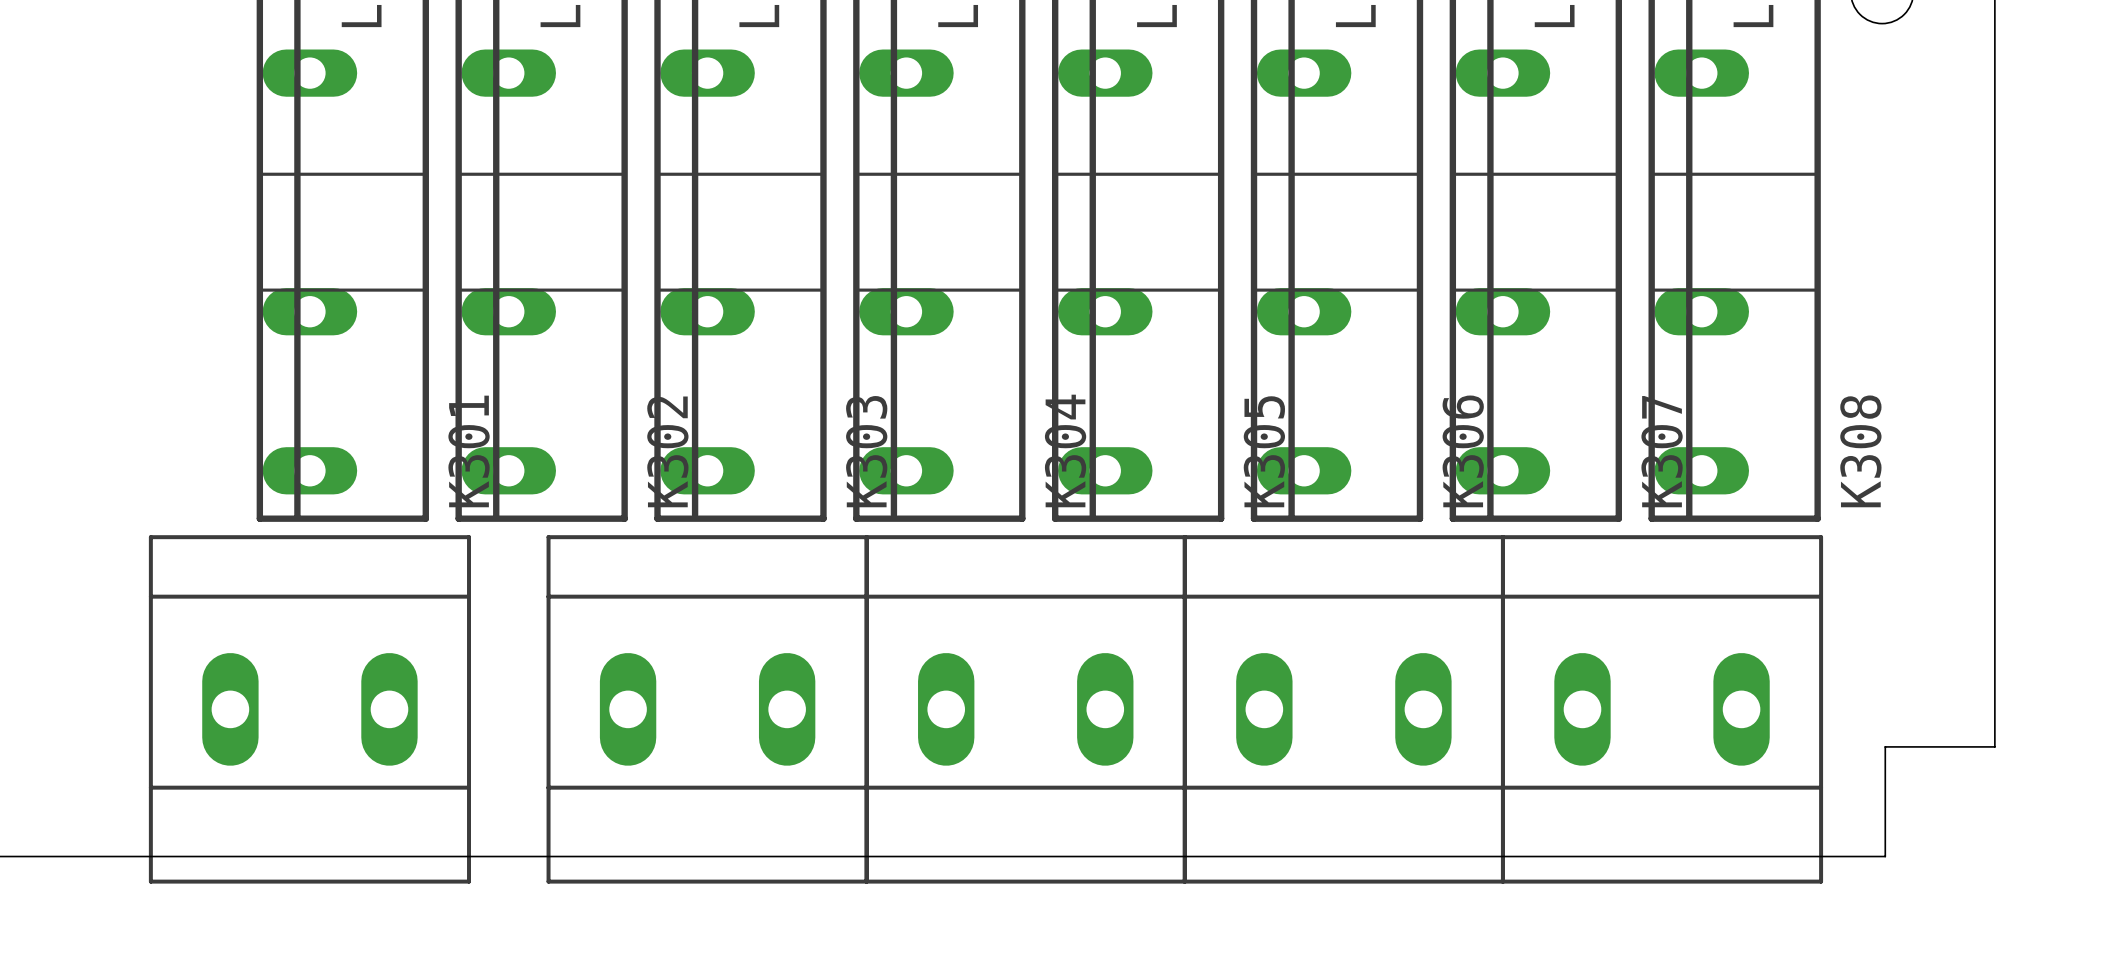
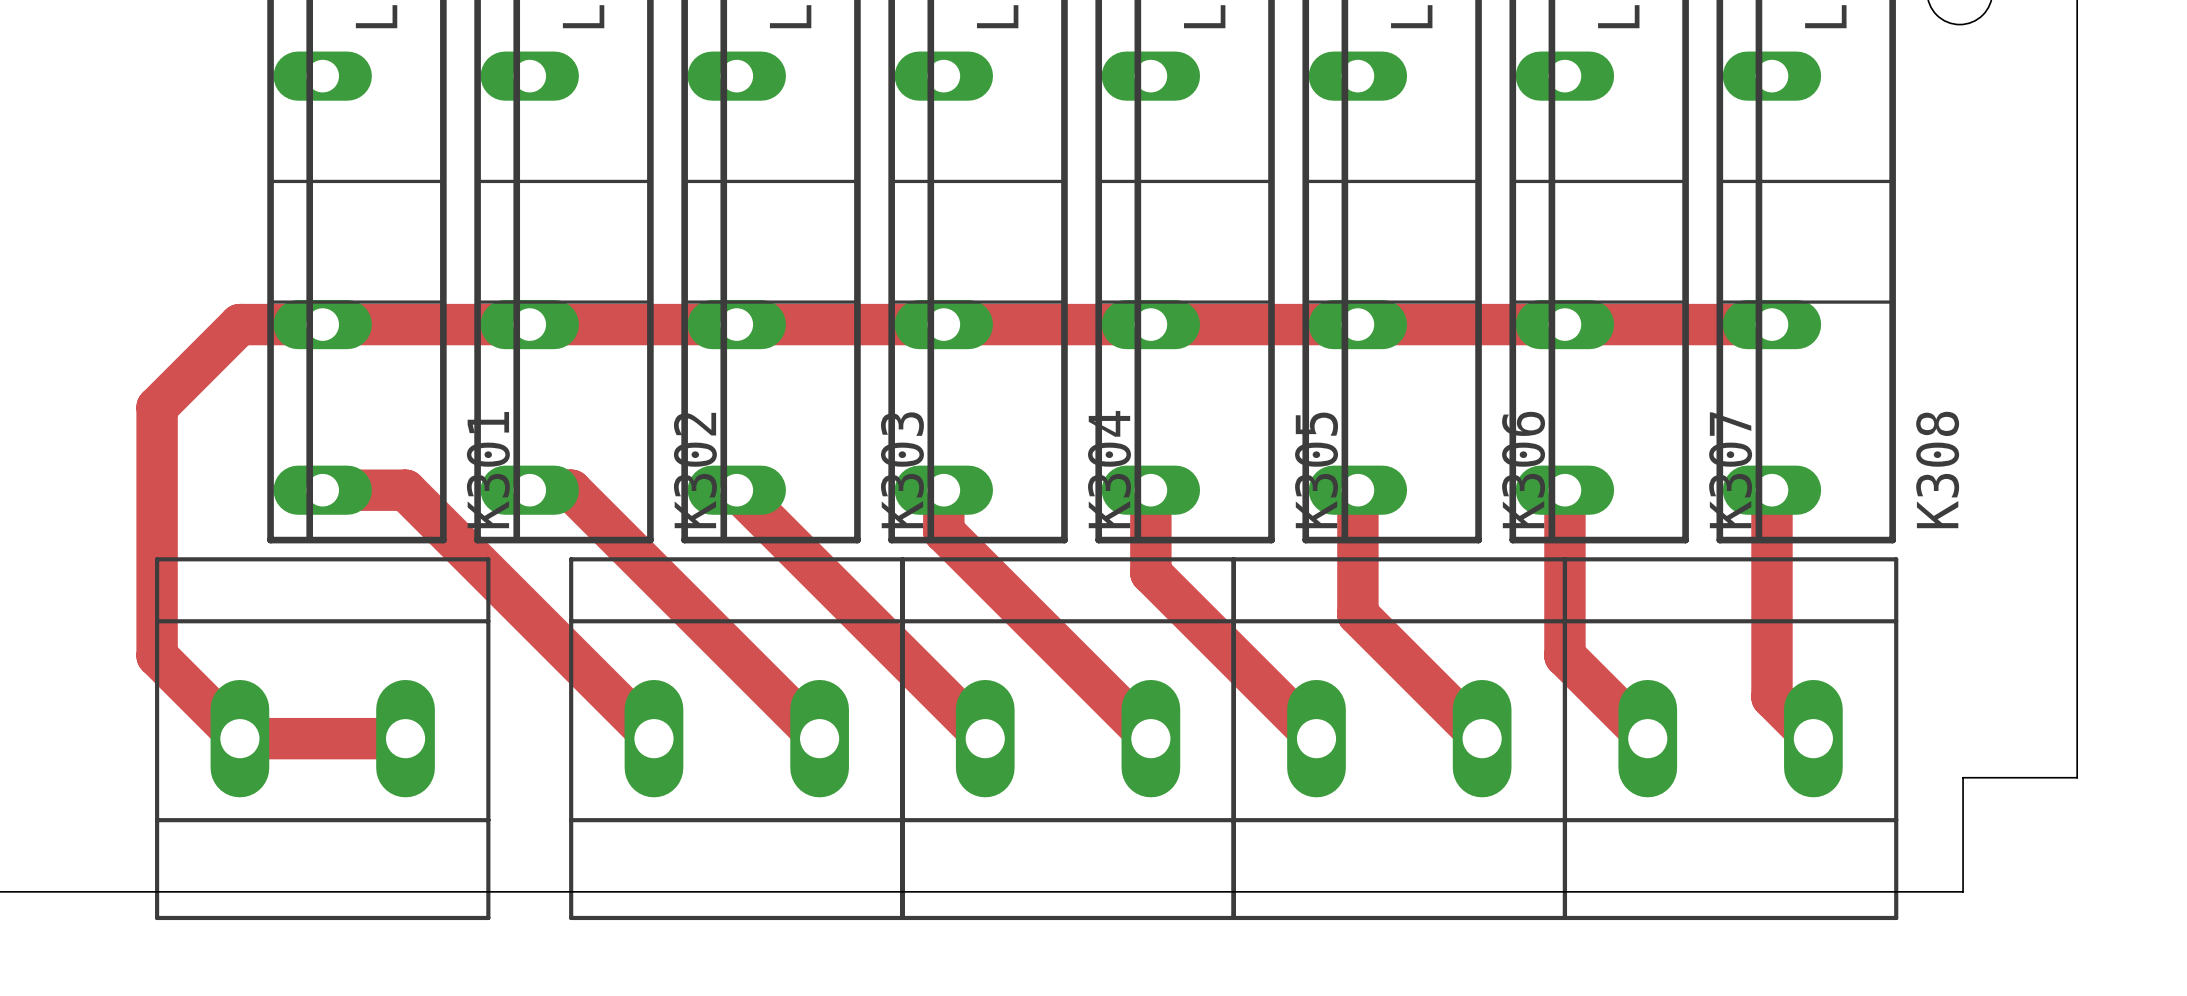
track: none -> (1771, 324) (239, 324) (157, 407) (157, 655) (239, 738) (405, 738)
track: none -> (322, 490) (405, 490) (653, 738)
track: none -> (529, 490) (571, 490) (819, 738)
track: none -> (736, 490) (985, 738)
track: none -> (943, 490) (943, 531) (1150, 738)
track: none -> (1150, 490) (1150, 573) (1316, 738)
track: none -> (1357, 490) (1357, 614) (1482, 738)
track: none -> (1564, 490) (1564, 655) (1647, 738)
track: none -> (1771, 490) (1771, 697) (1813, 738)

